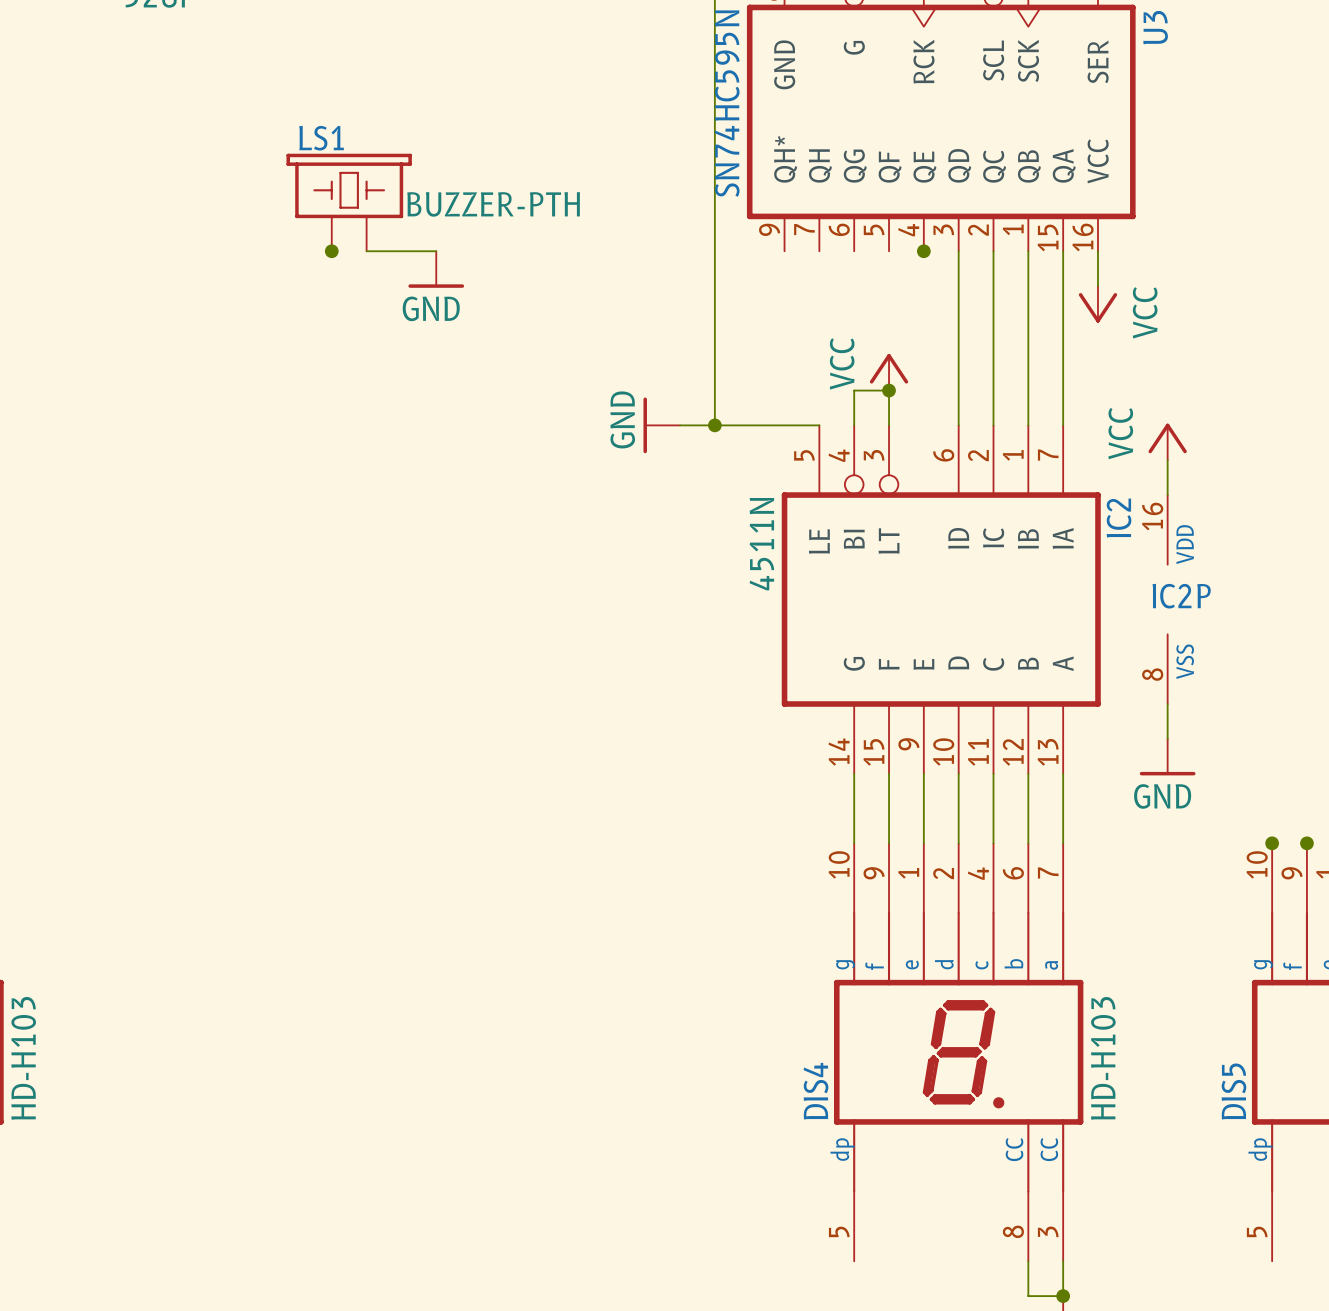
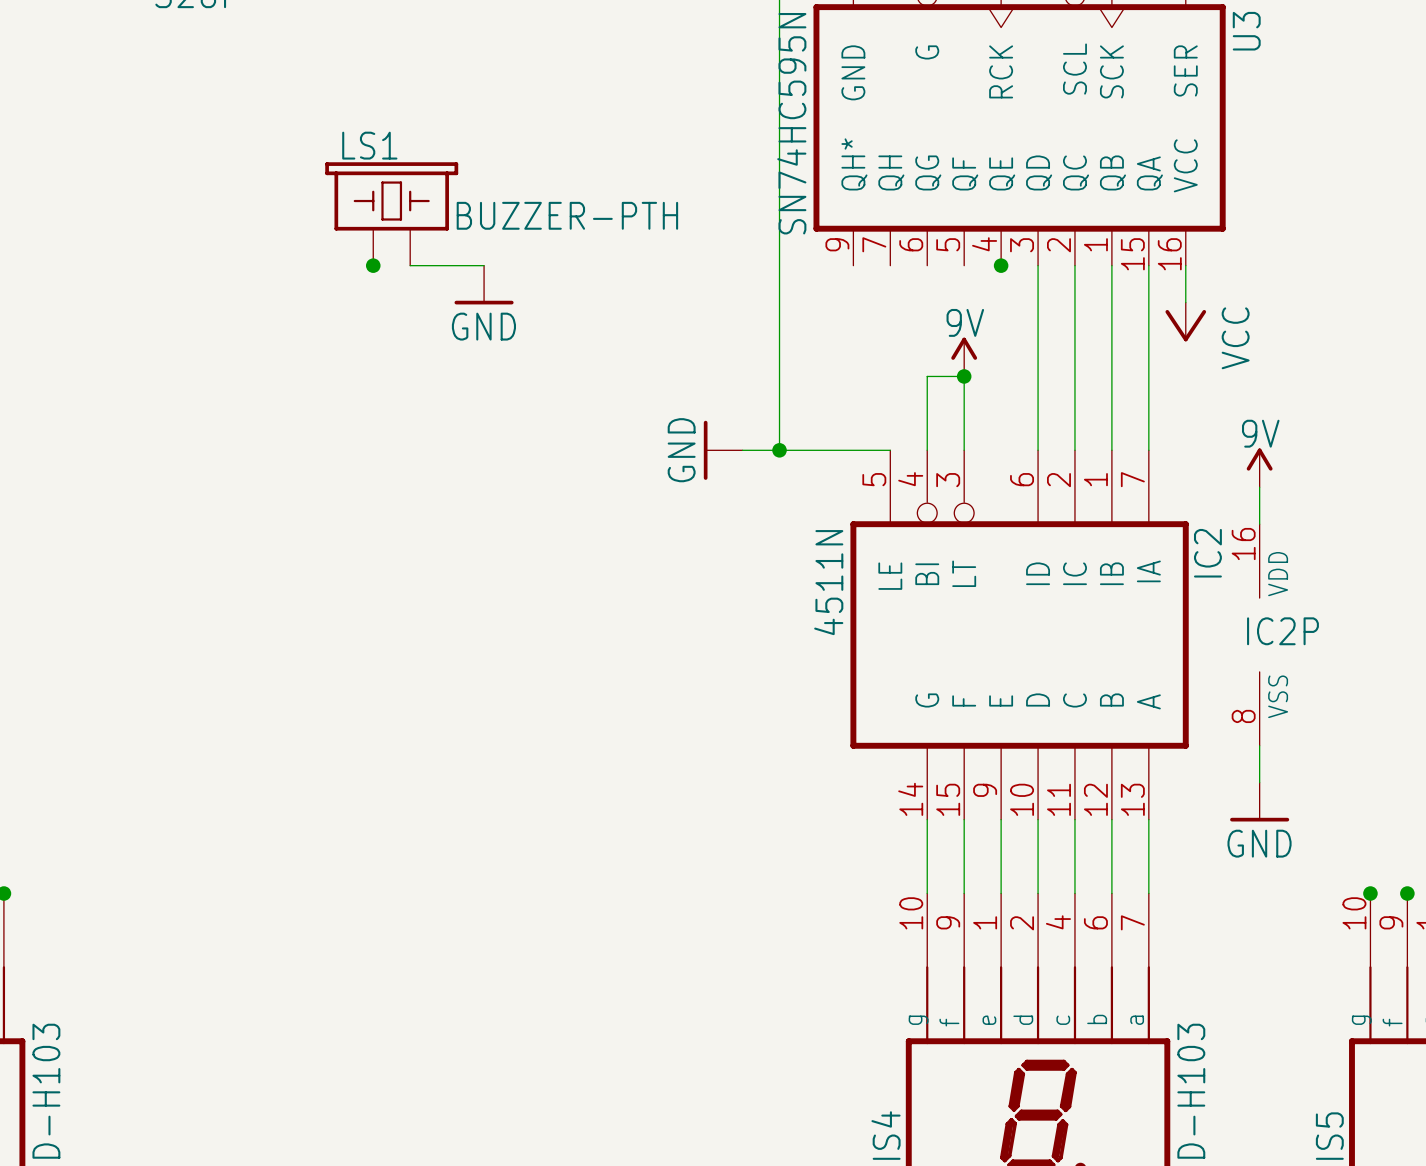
power symbol: none -> 9V (964, 357)
power symbol: VCC (889, 372) -> none
wire: (854, 390) (889, 390) -> (927, 413) (927, 376) (964, 376) (964, 413)
junction position: (889, 390) -> (964, 376)
power symbol: VCC (1167, 441) -> 9V (1259, 467)

